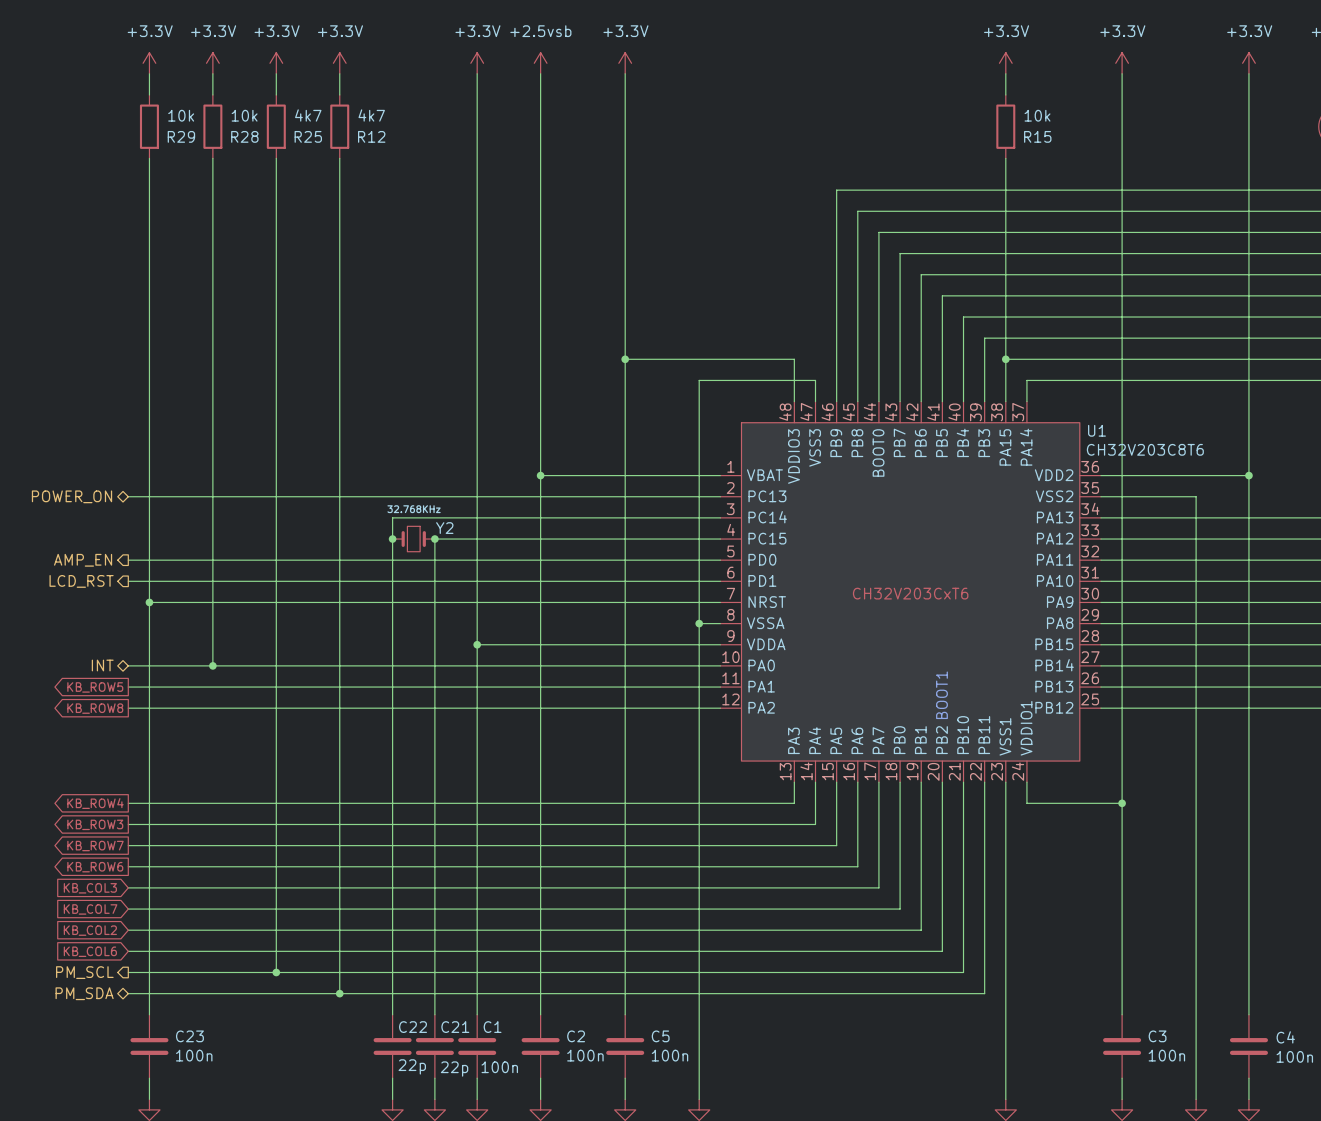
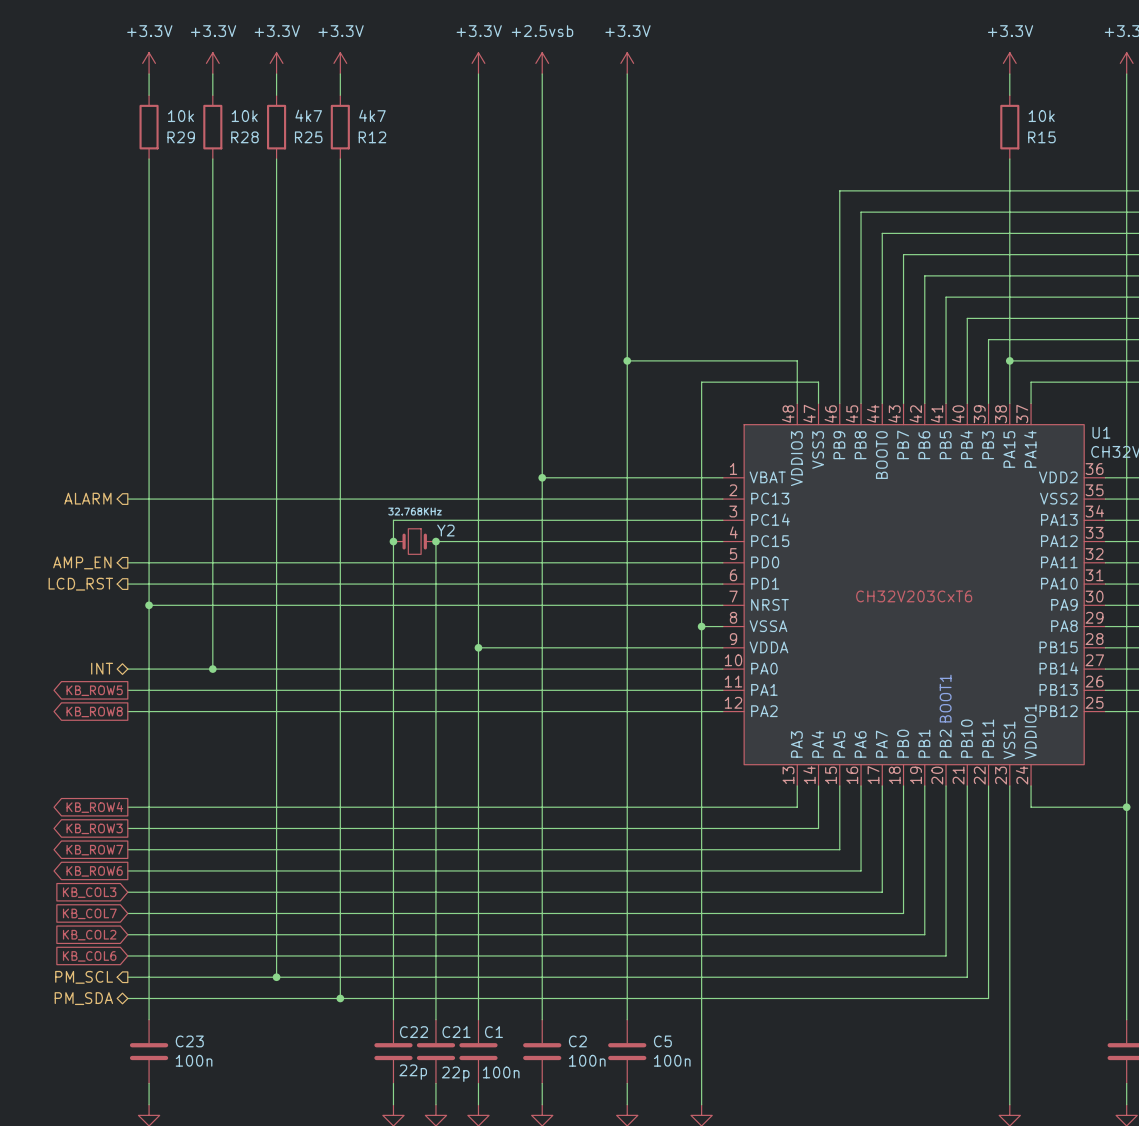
hierarchical label shape: bidirectional (72, 496) -> output (87, 498)
hierarchical label: POWER_ON (72, 496) -> ALARM (87, 498)

